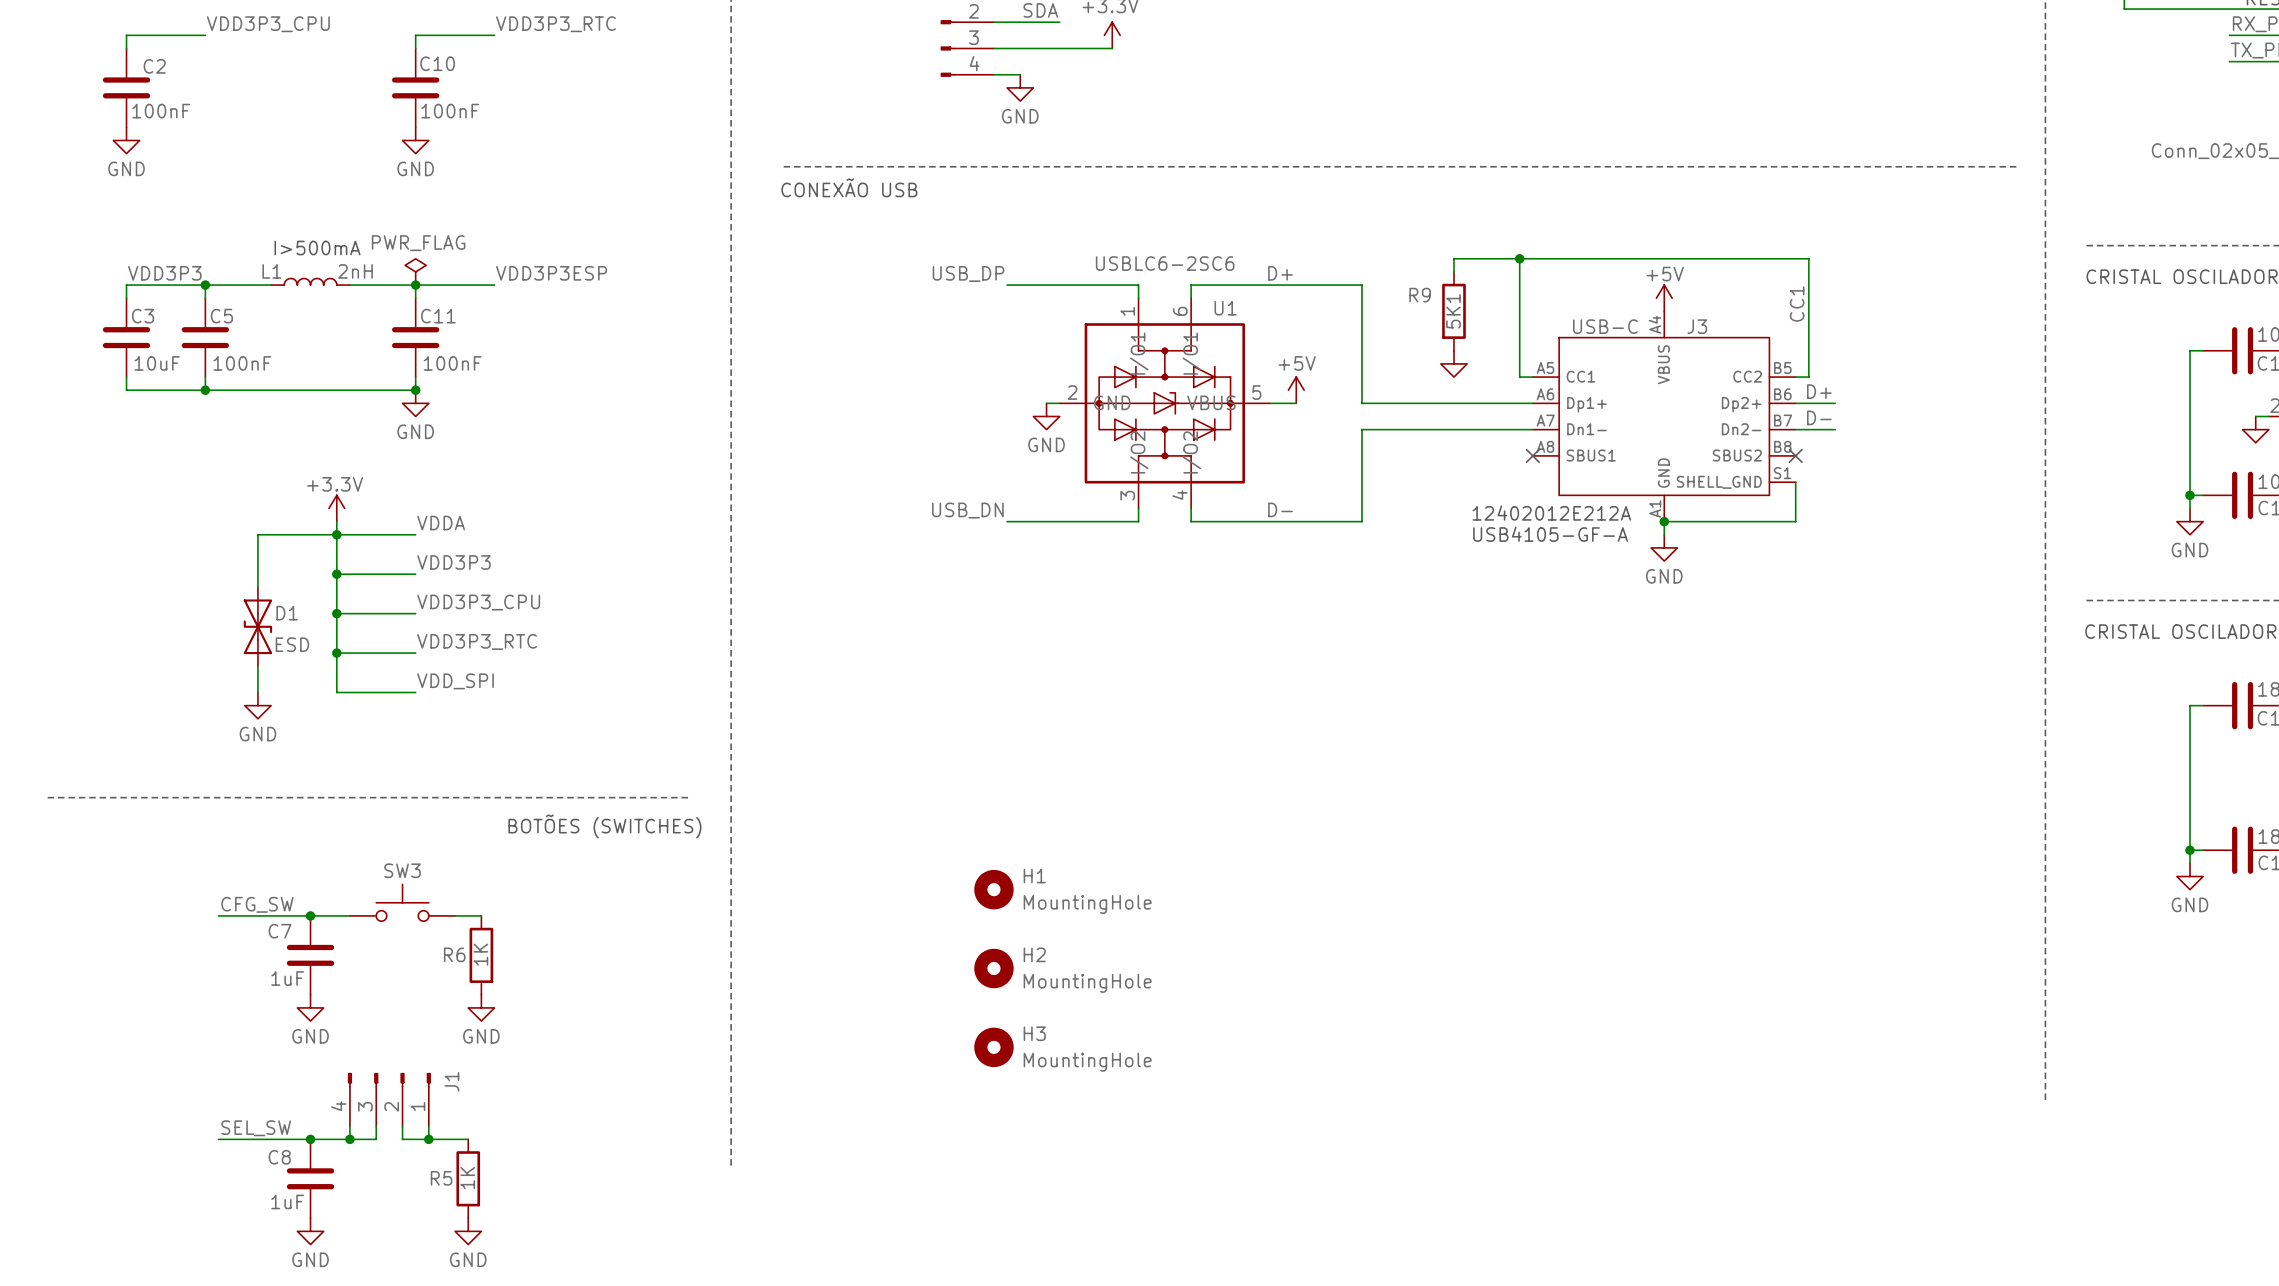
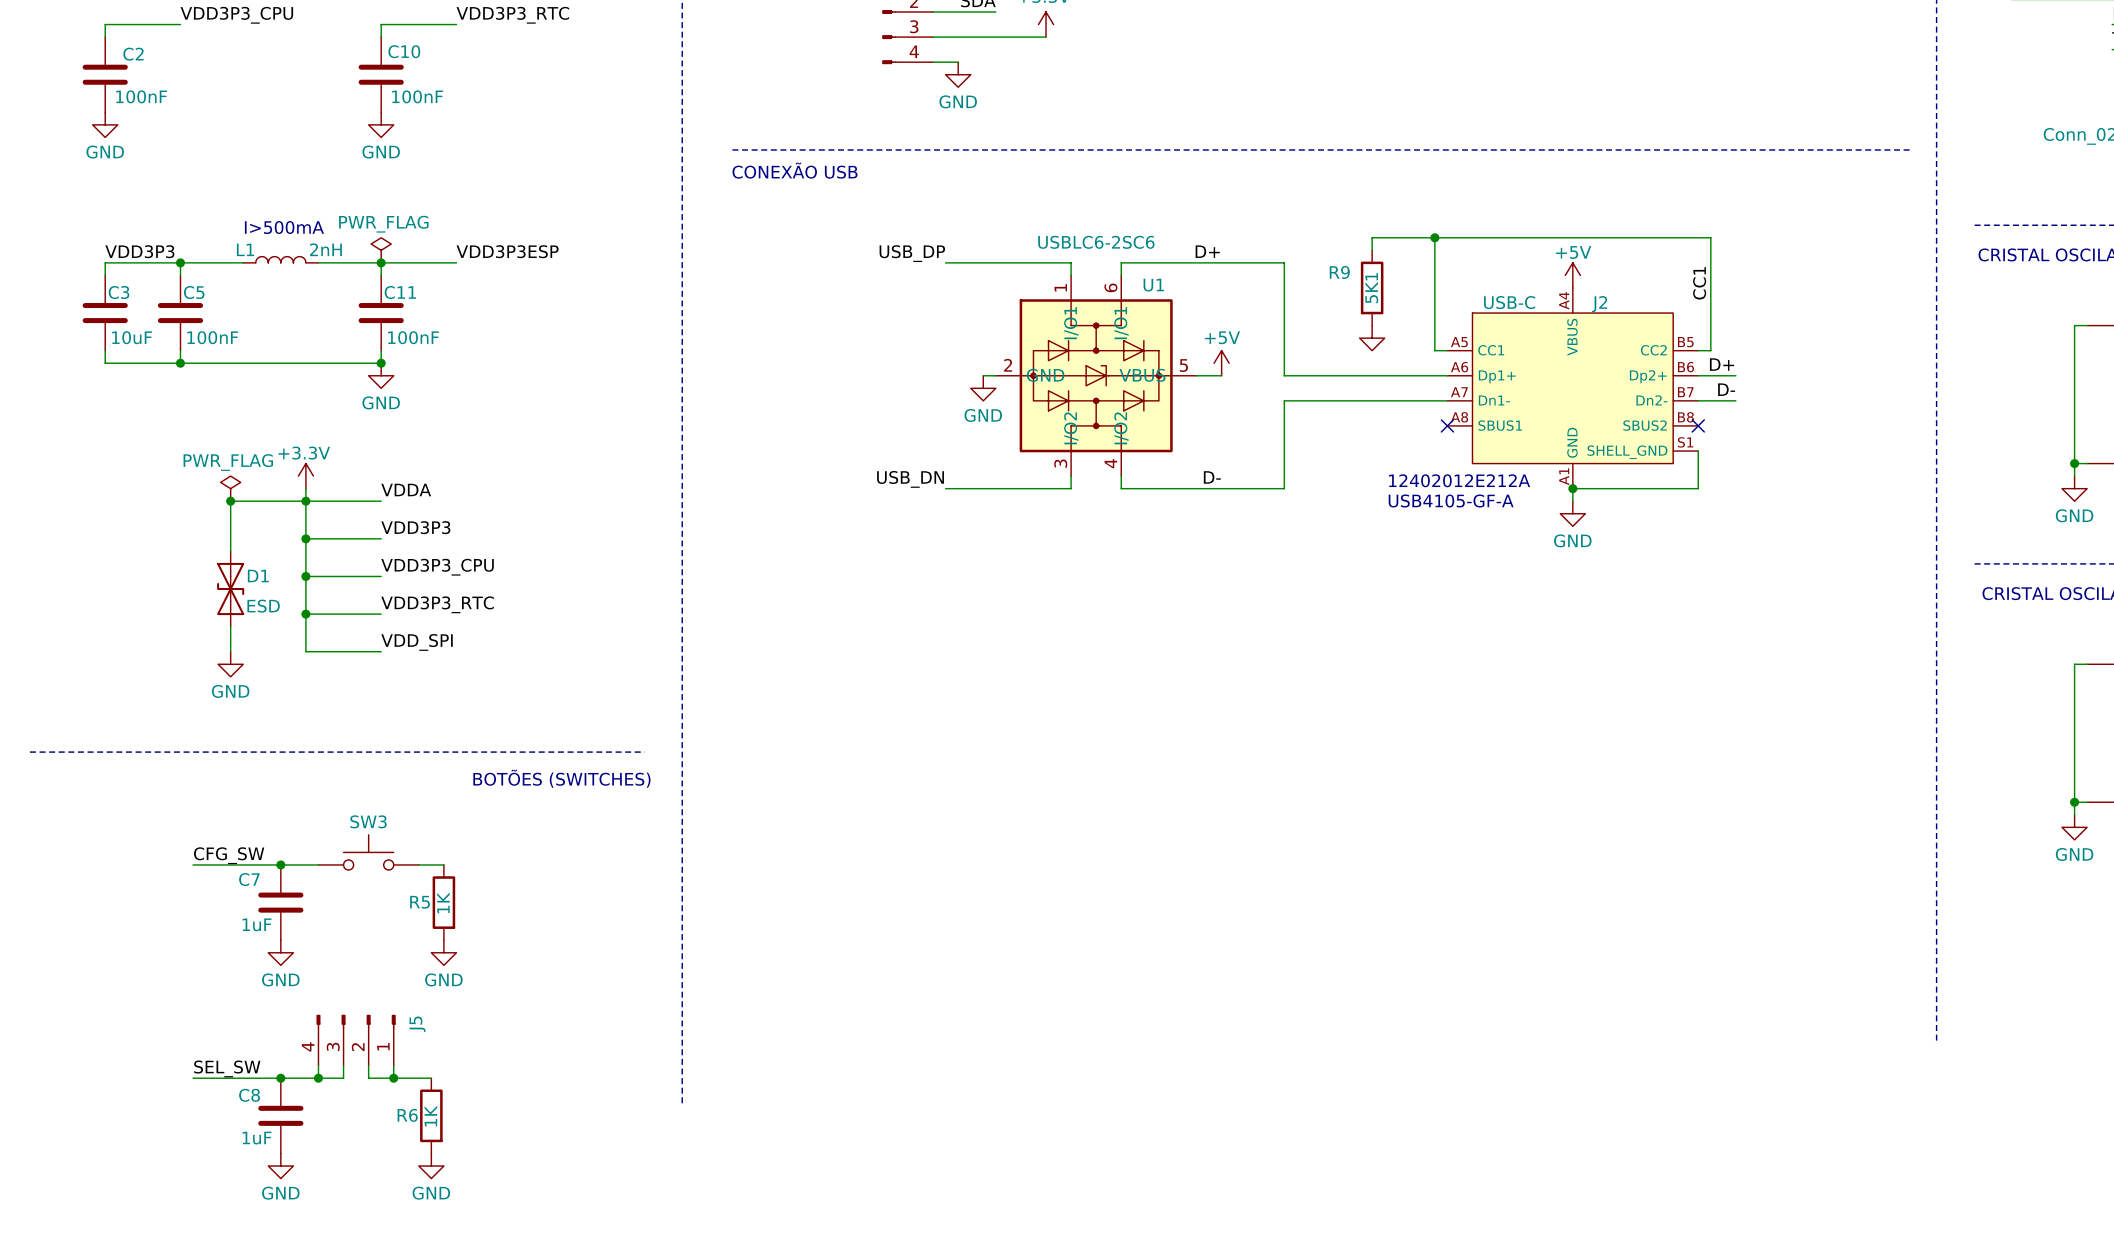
J3 name: J3 (1697, 326) -> J2 (1599, 304)
power symbol: none -> PWR_FLAG (230, 488)
junction: none -> (230, 501)
H1: MountingHole (993, 889) -> none
R6 name: R6 (454, 954) -> R5 (420, 902)
H2: MountingHole (993, 968) -> none
H3: MountingHole (993, 1047) -> none
J1 name: J1 (451, 1081) -> J5 (417, 1024)
R5 name: R5 (441, 1178) -> R6 (407, 1115)

